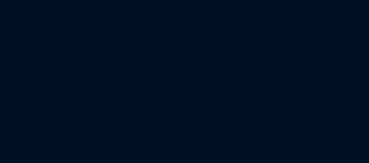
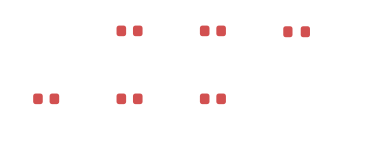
part: none -> (129, 30)
part: none -> (212, 30)
part: none -> (296, 31)
part: none -> (46, 98)
part: none -> (129, 98)
part: none -> (212, 98)

